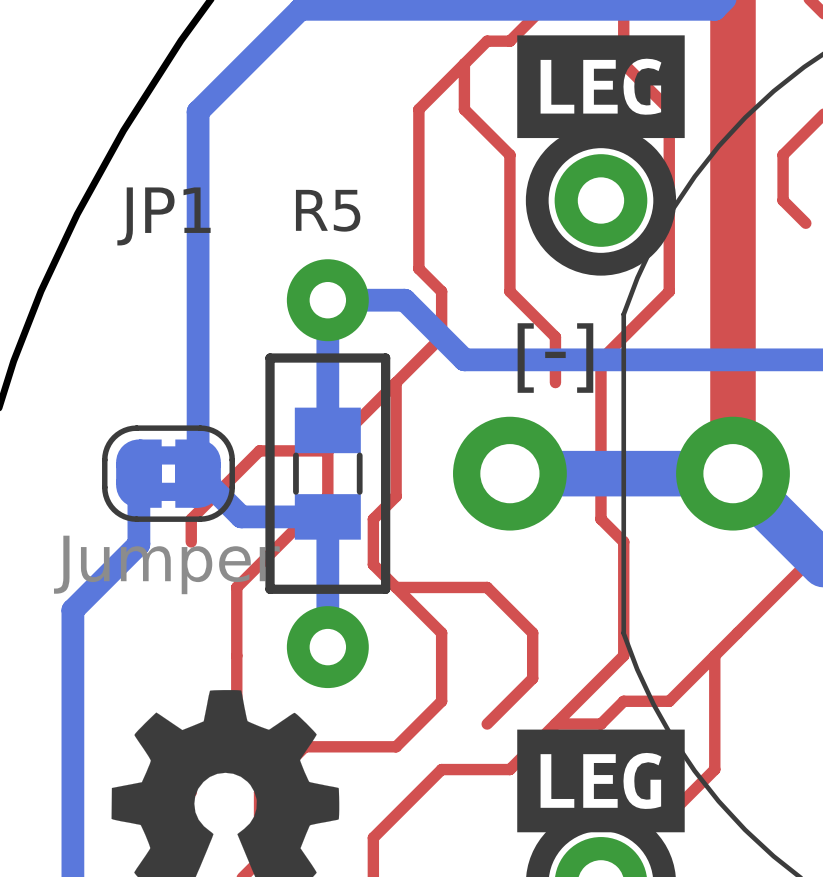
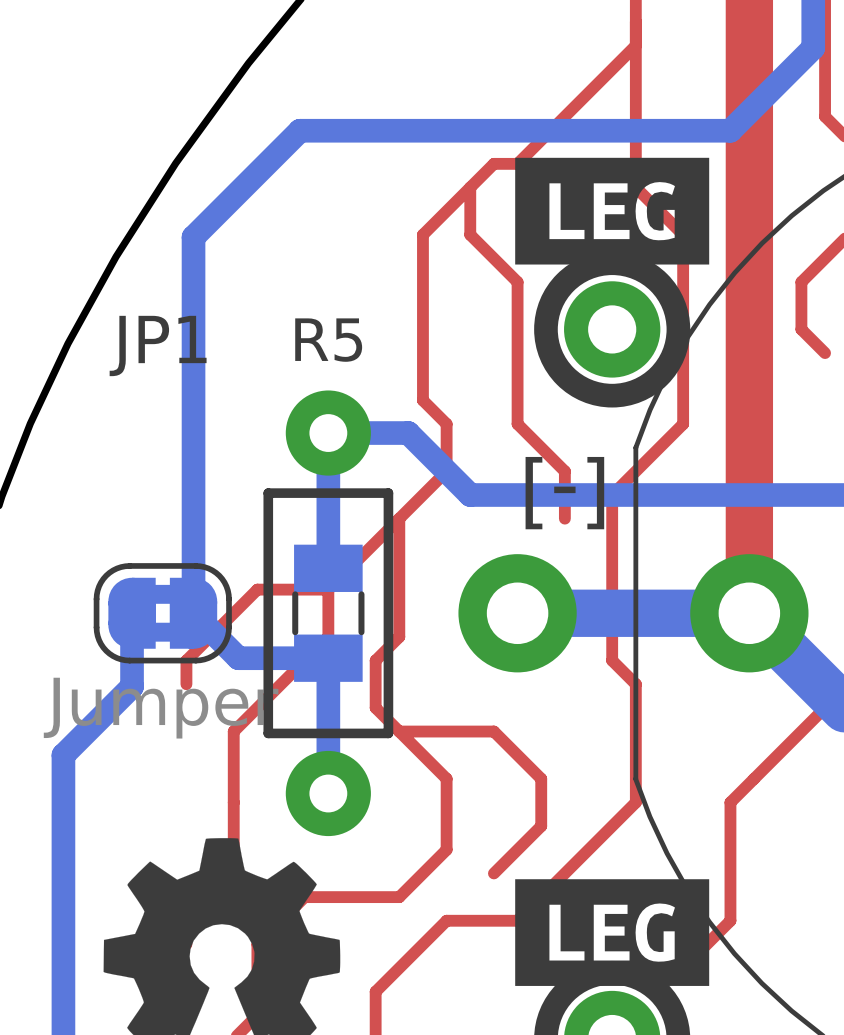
drawing shape: [517, 35, 685, 139] -> [515, 157, 710, 265]
top track: (714, 655) (669, 701) (623, 701) (600, 724) (555, 724) -> none
drawing shape: [517, 729, 685, 833] -> [515, 879, 710, 986]

